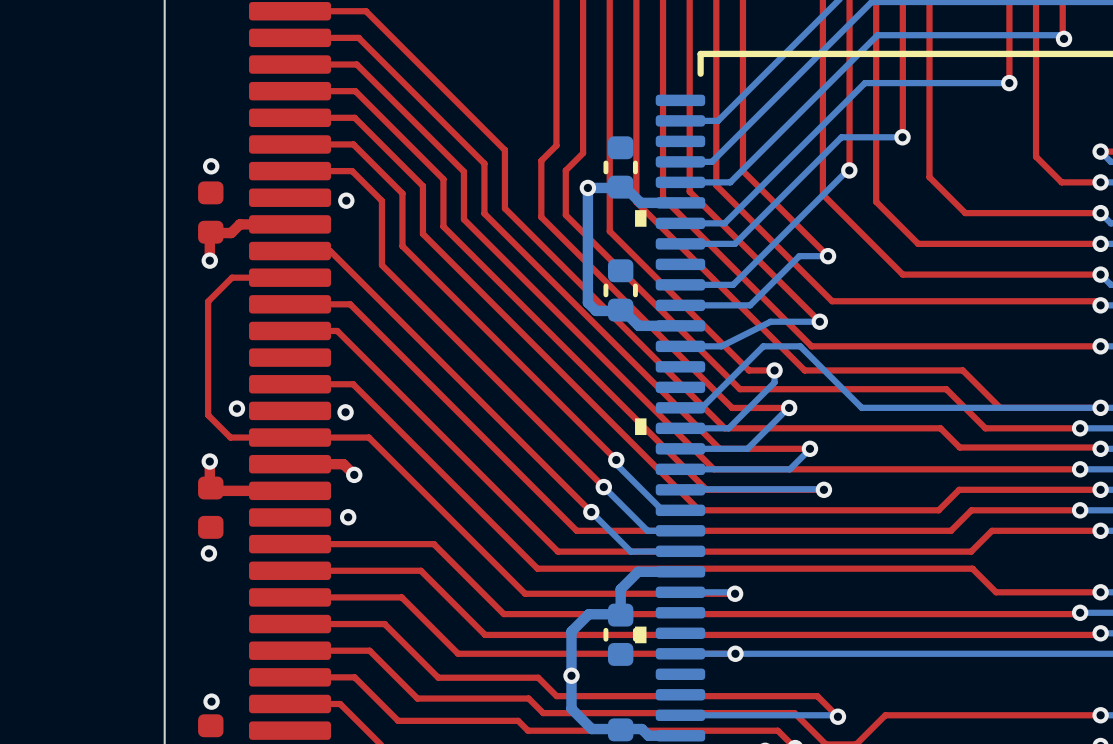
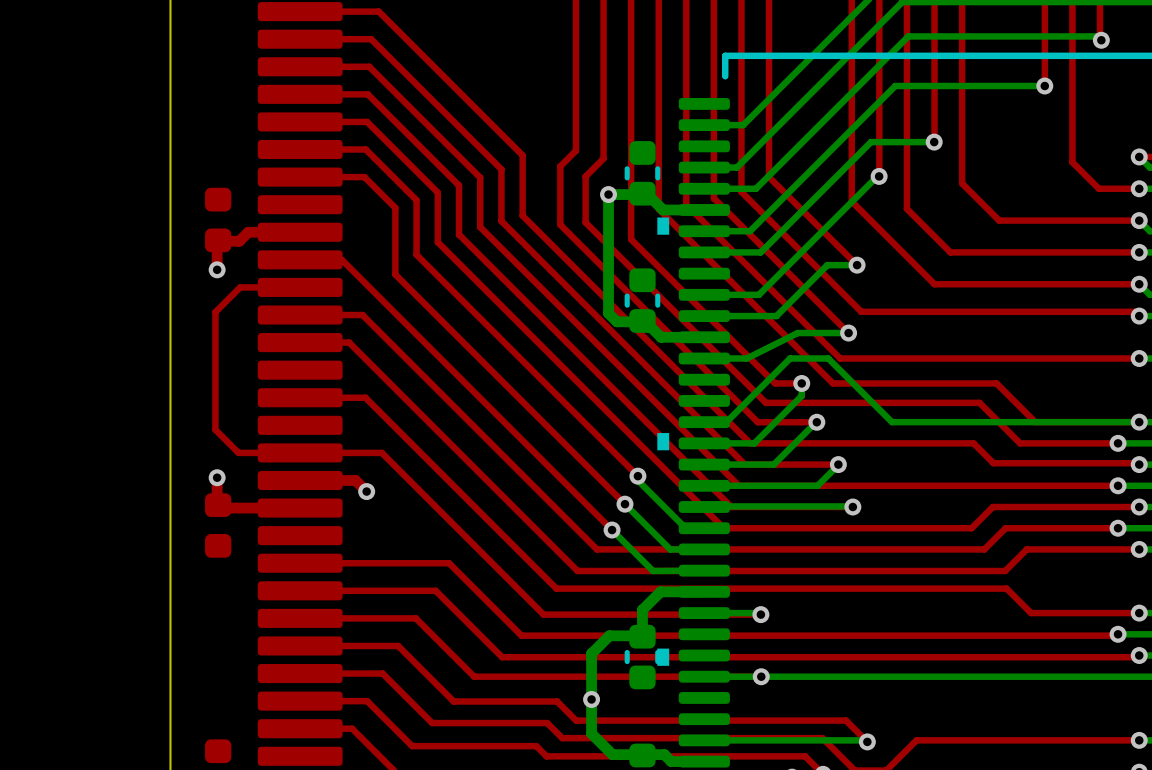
via: (211, 166) -> none
via: (346, 200) -> none
via: (236, 408) -> none
via: (345, 412) -> none
via: (348, 517) -> none
via: (208, 553) -> none
via: (211, 701) -> none

